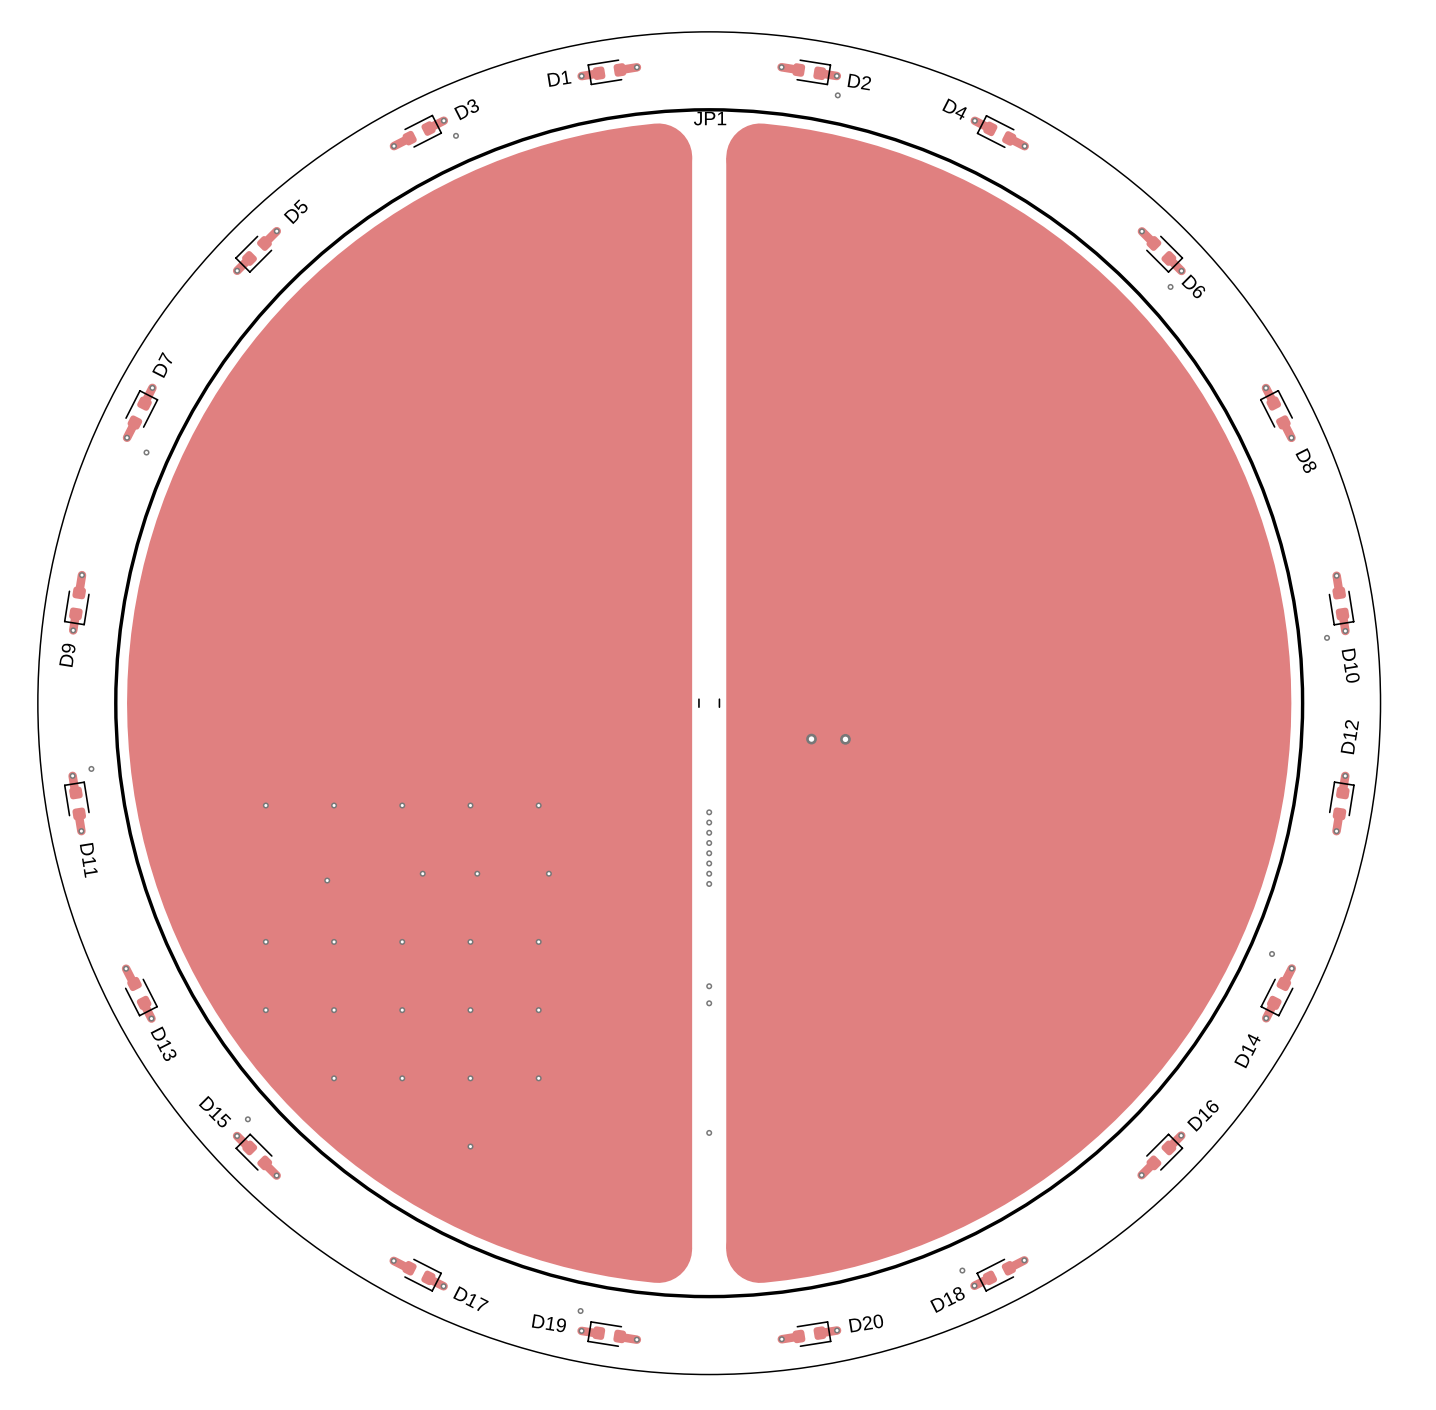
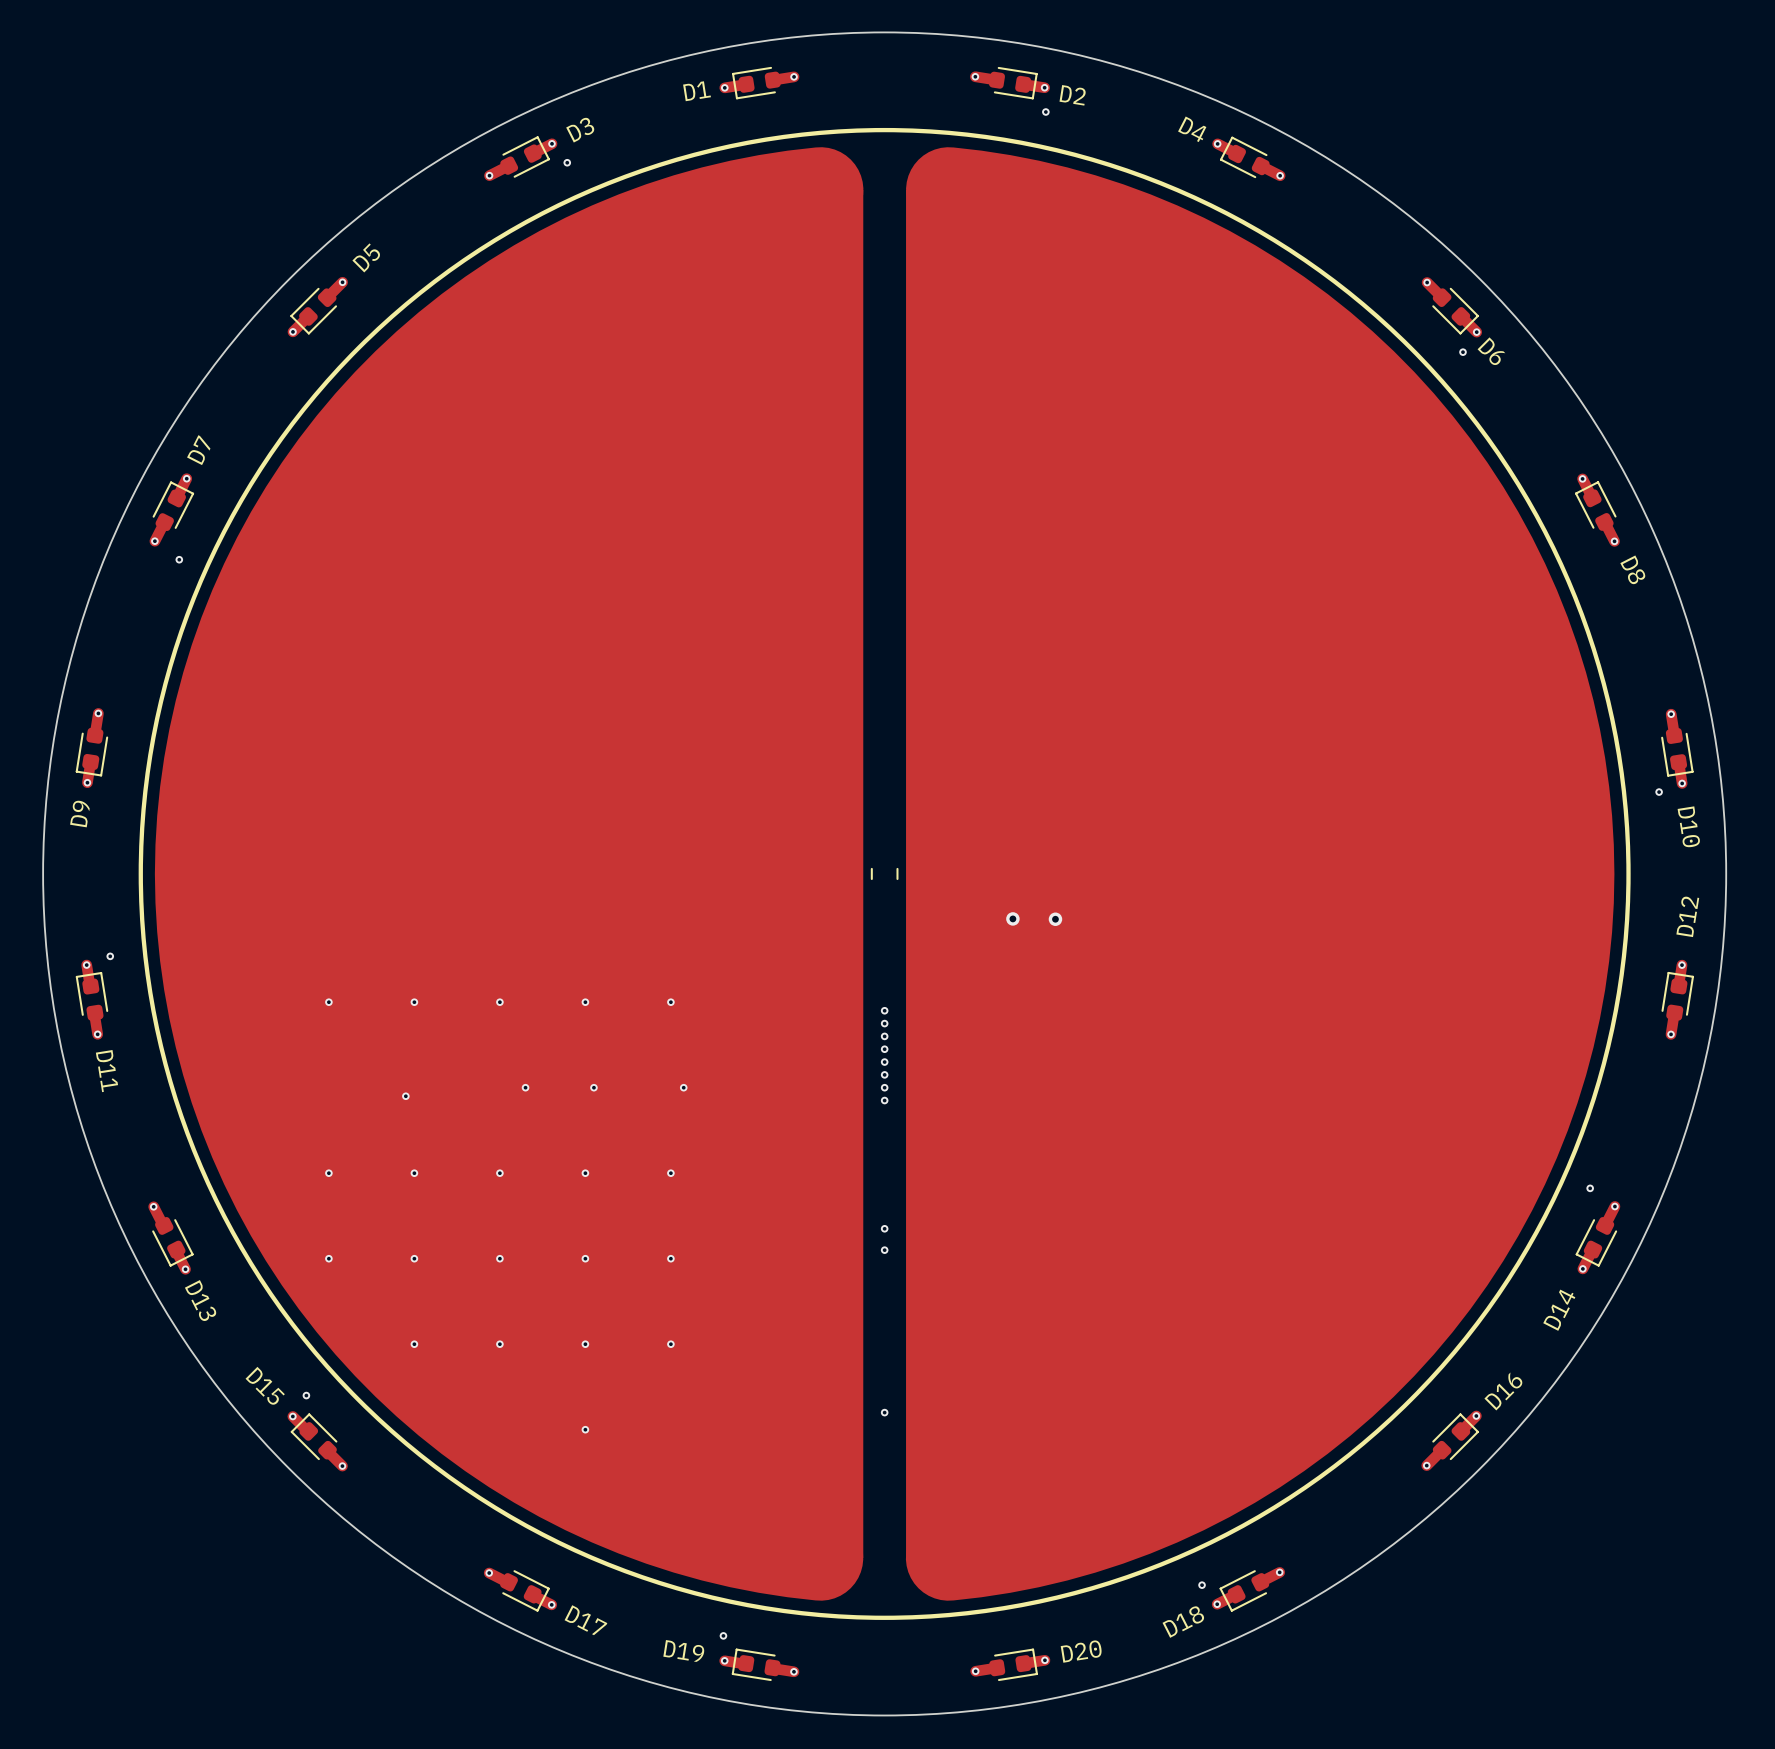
JP1 name: JP1 (710, 118) -> none

